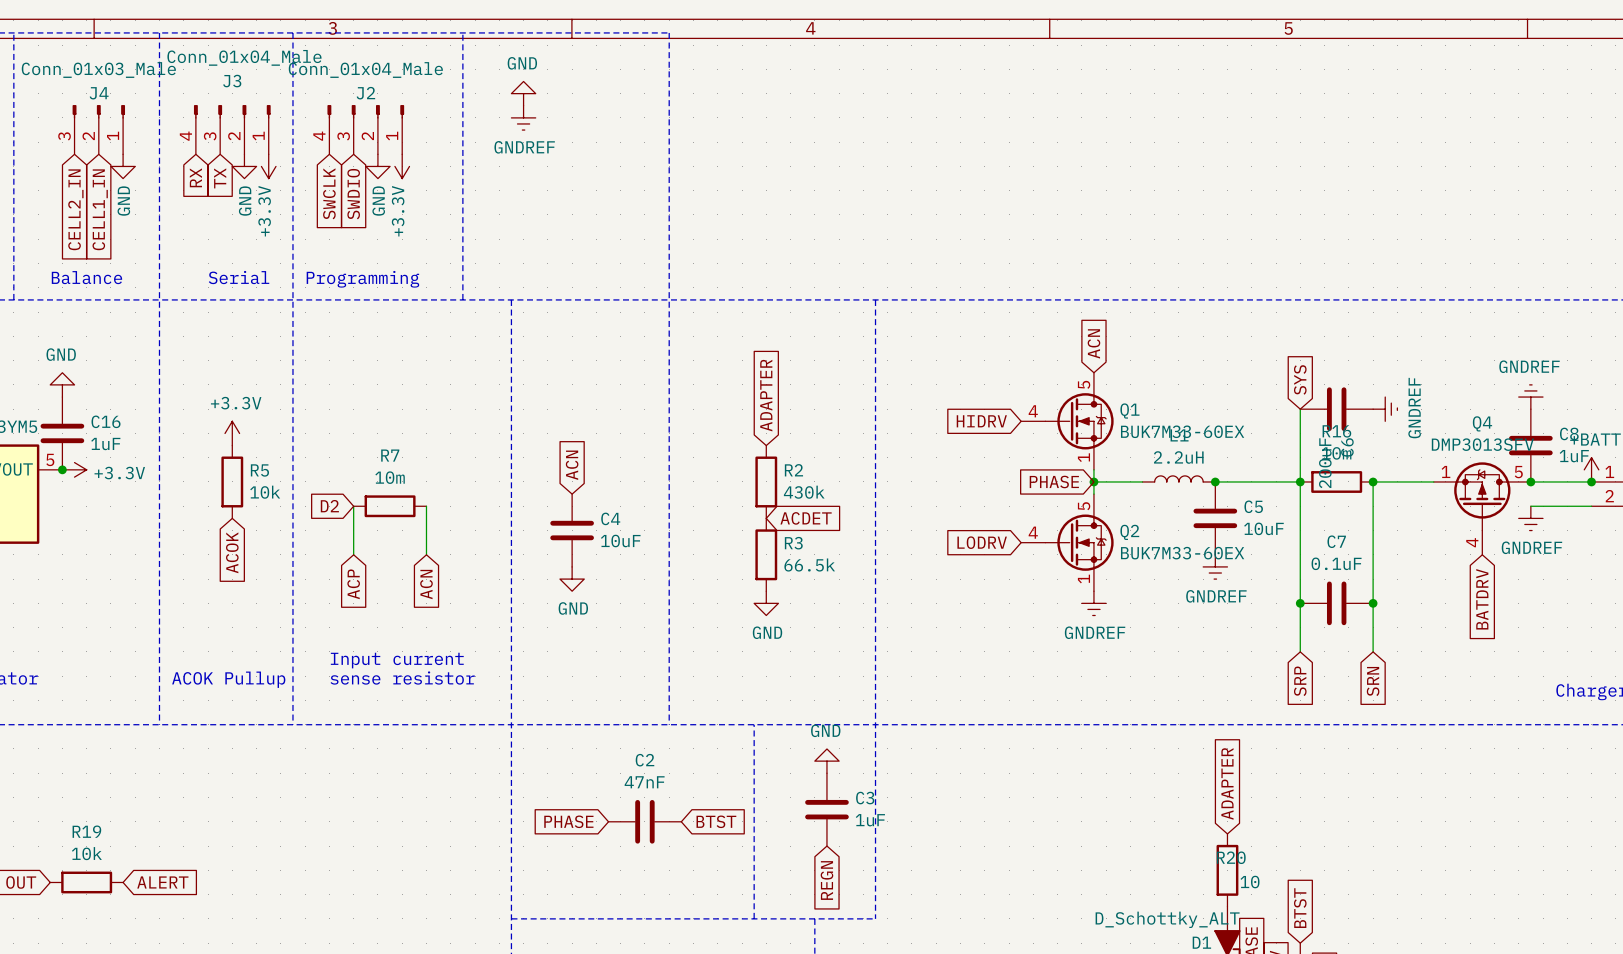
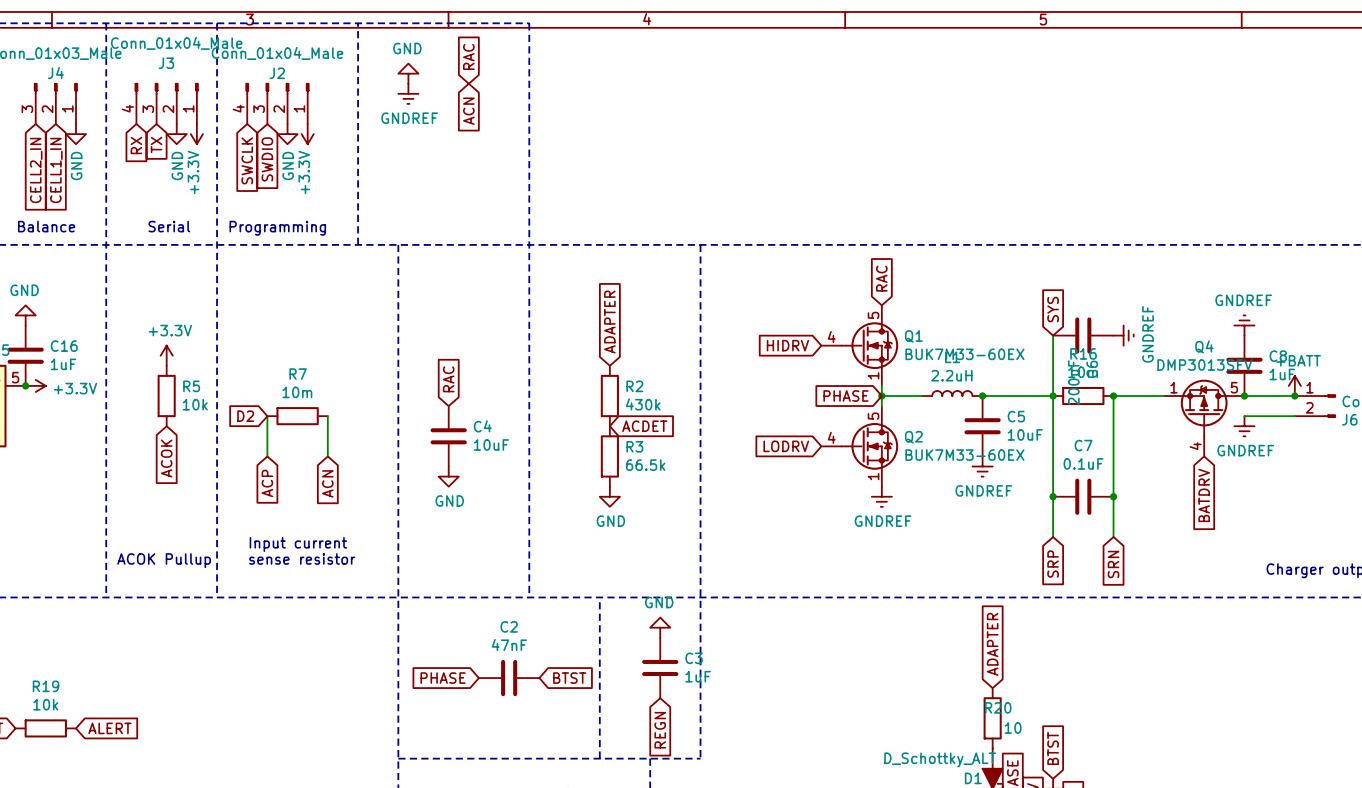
global label: none -> RAC (468, 56)
global label: none -> ACN (468, 111)
global label: ACN (1093, 343) -> RAC (881, 278)
global label: ACN (572, 465) -> RAC (448, 379)

